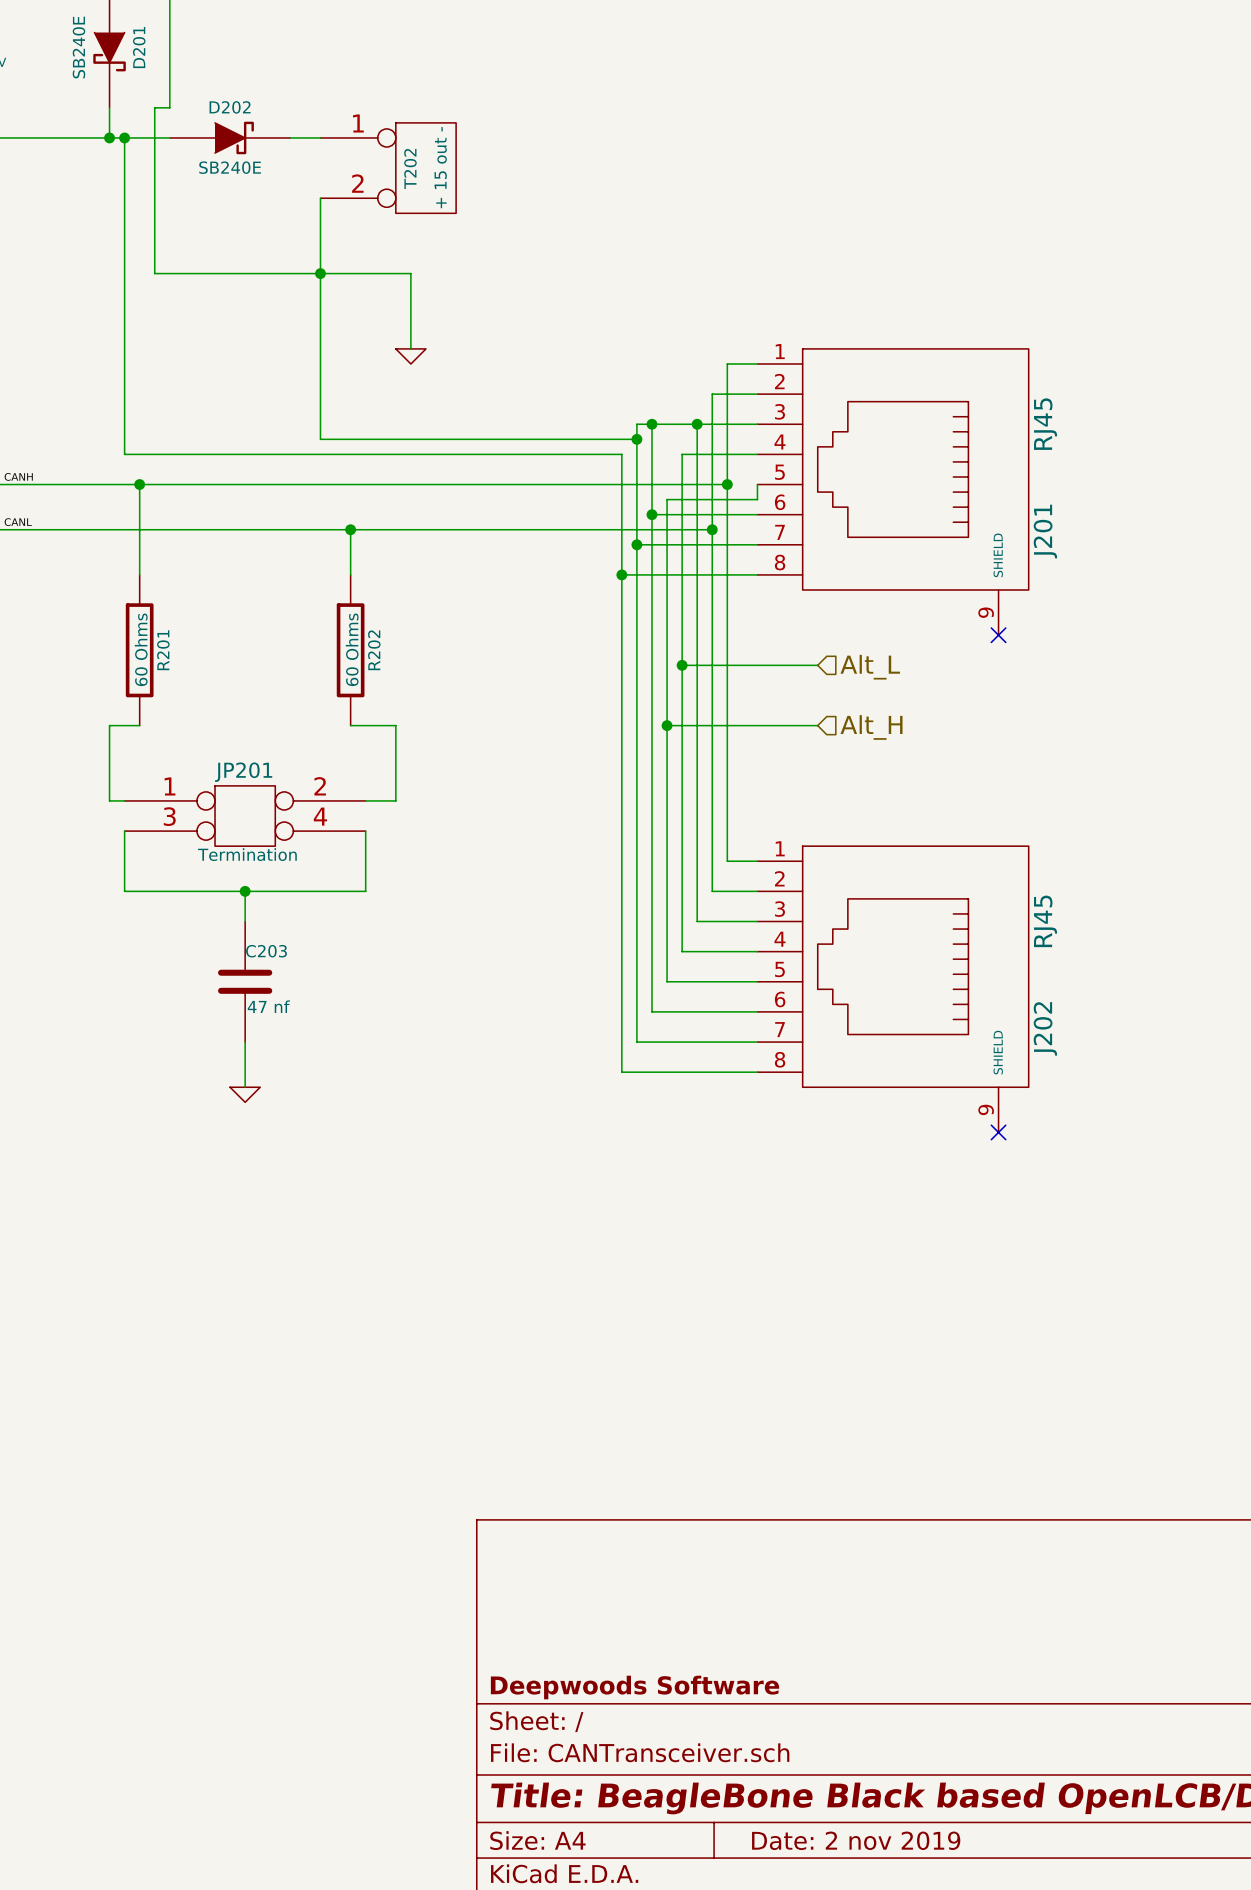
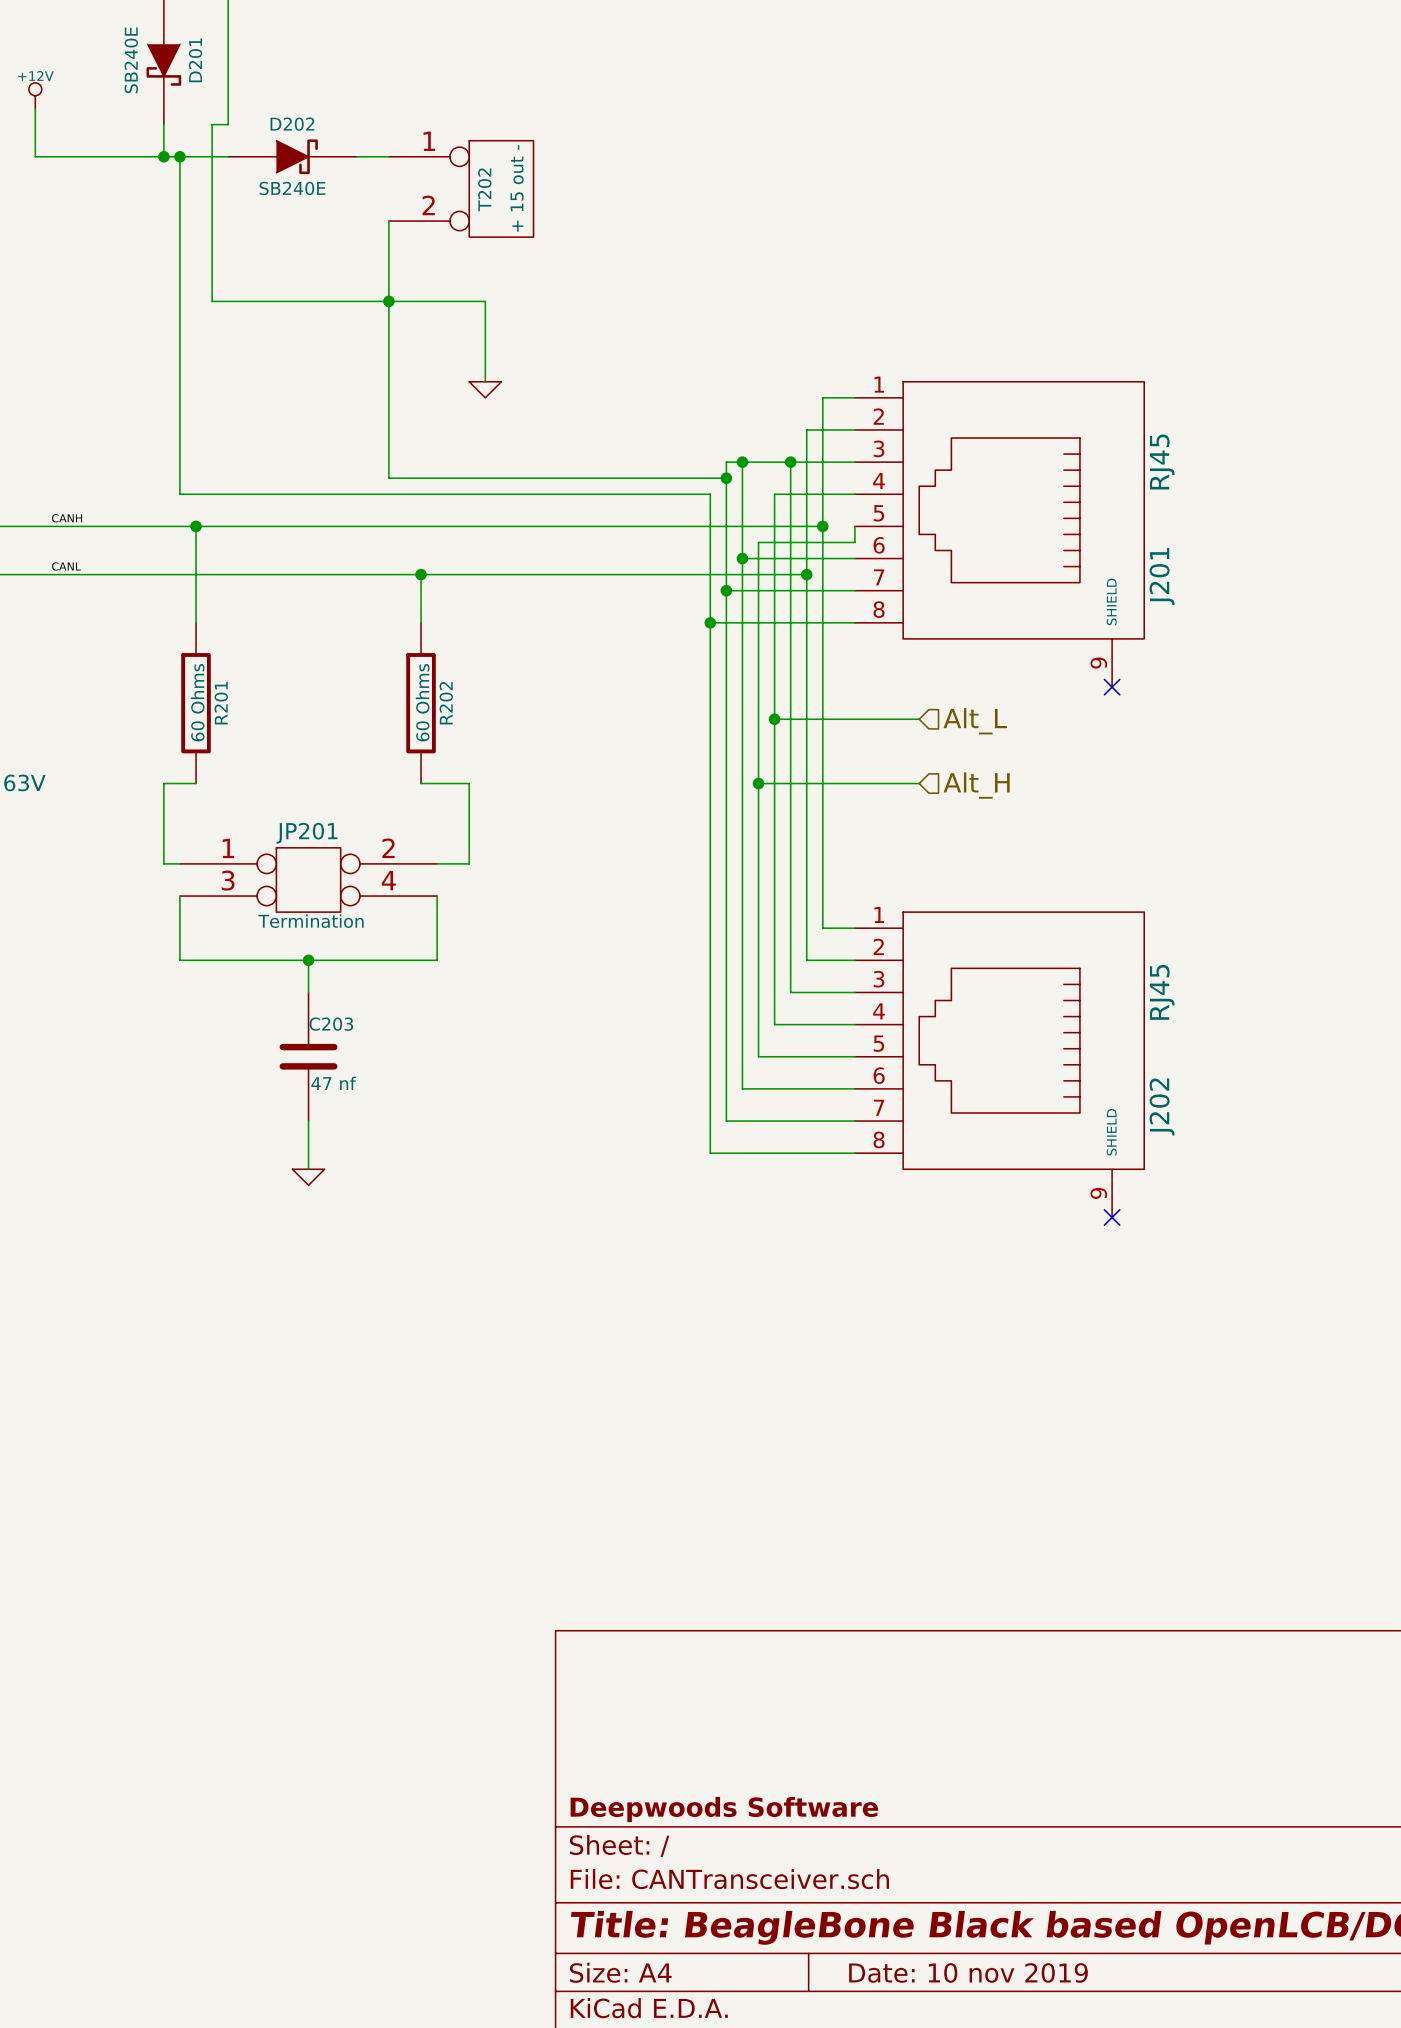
title block: Date: 2 nov 2019 (856, 1840) -> Date: 10 nov 2019 (968, 1972)

